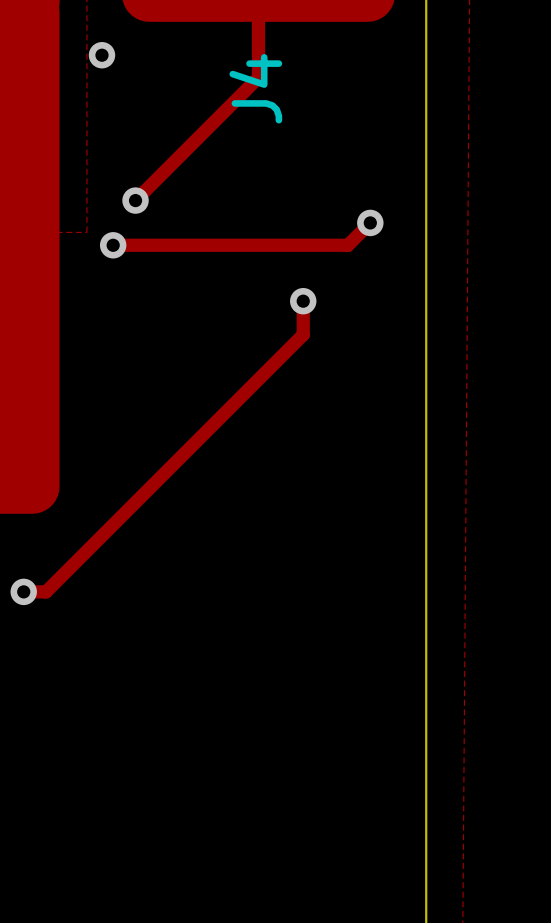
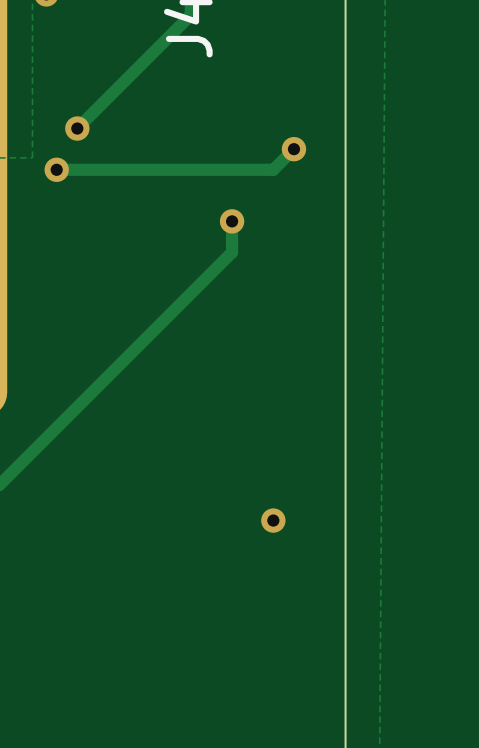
via: none -> (273, 520)

